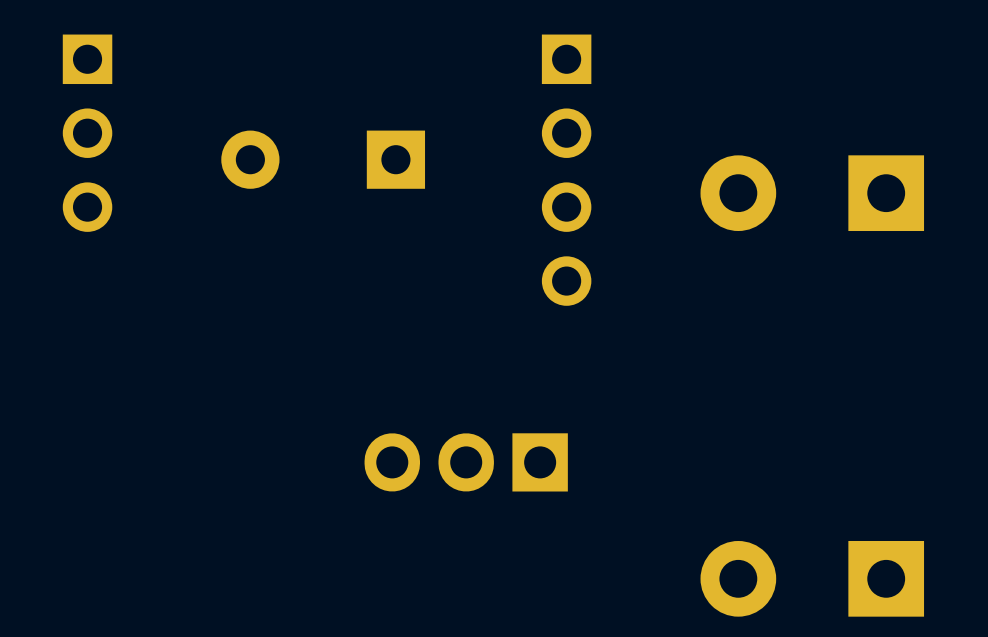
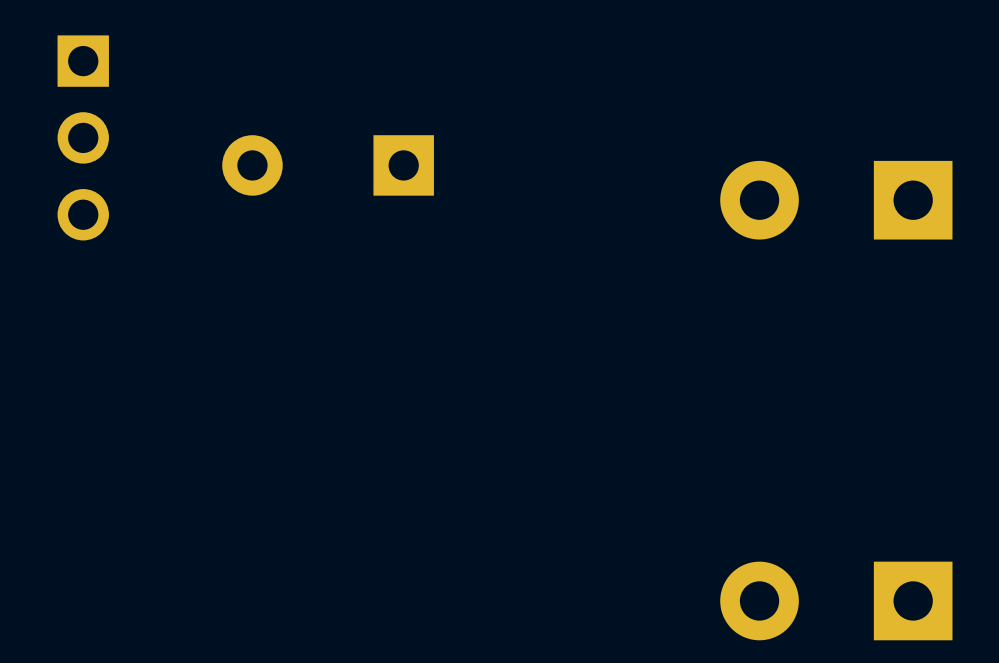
part: (566, 170) -> none
part: (466, 462) -> none

